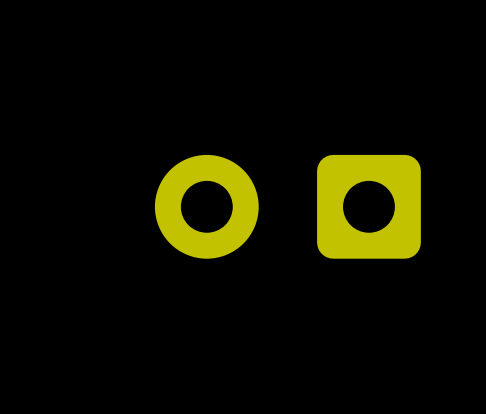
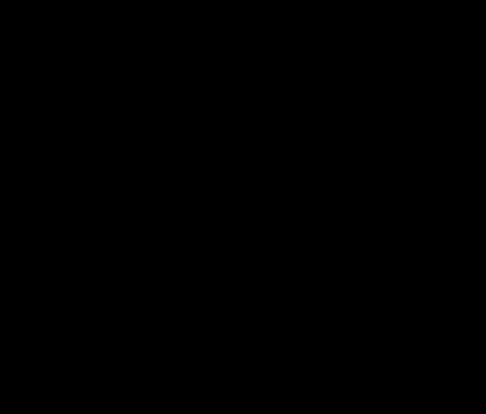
part: (287, 206) -> none

